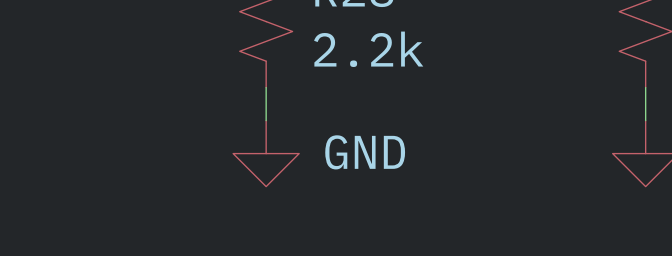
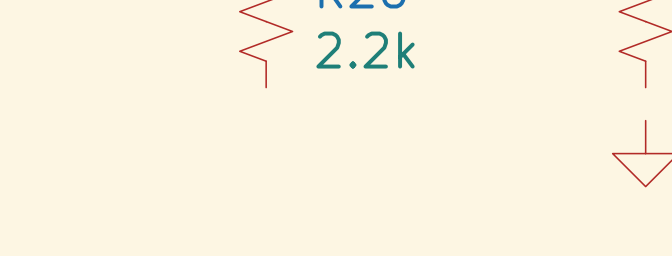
wire: (266, 87) (266, 120) -> none
wire: (645, 87) (645, 120) -> none
power symbol: GND (266, 153) -> none

